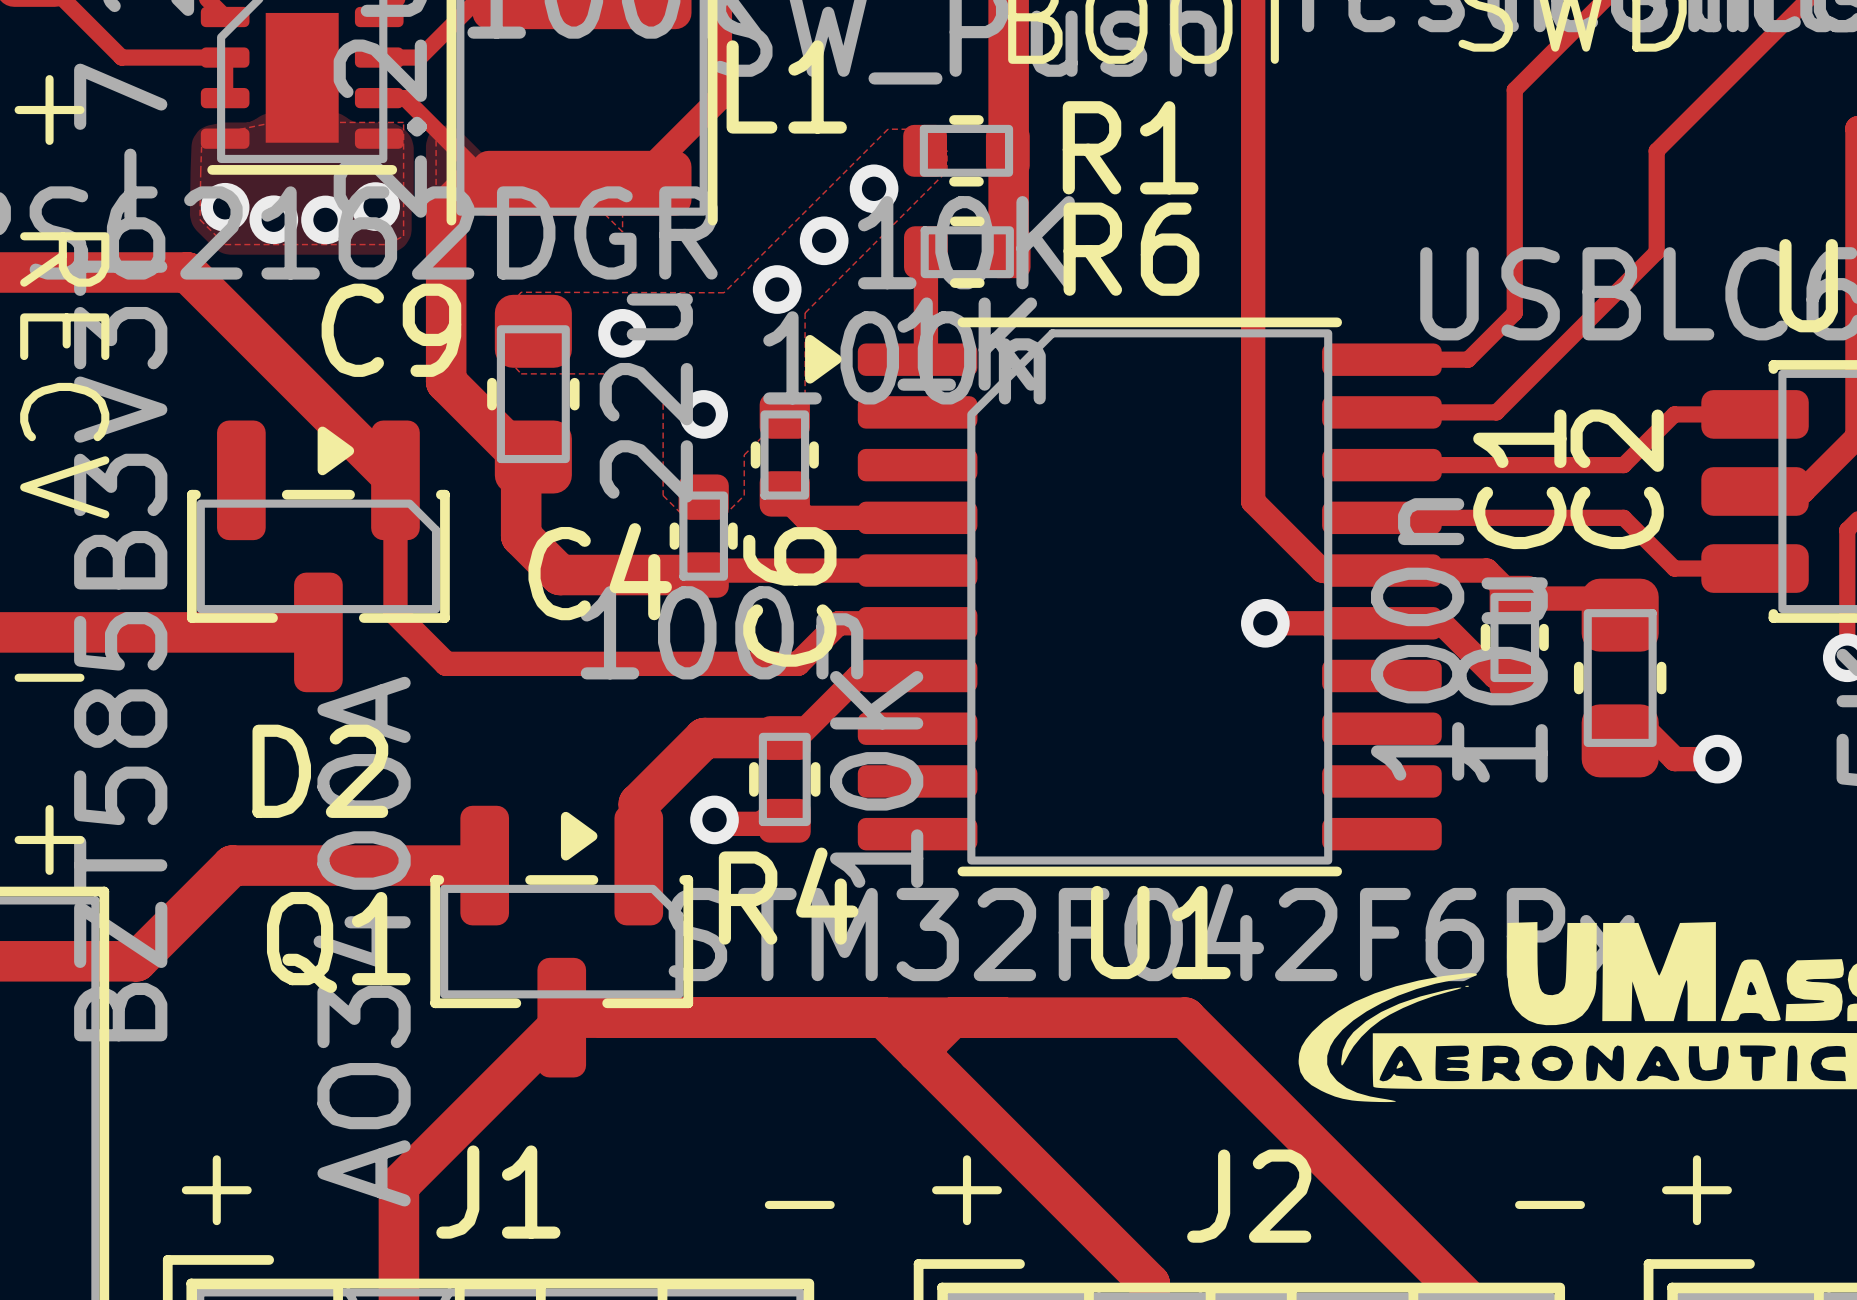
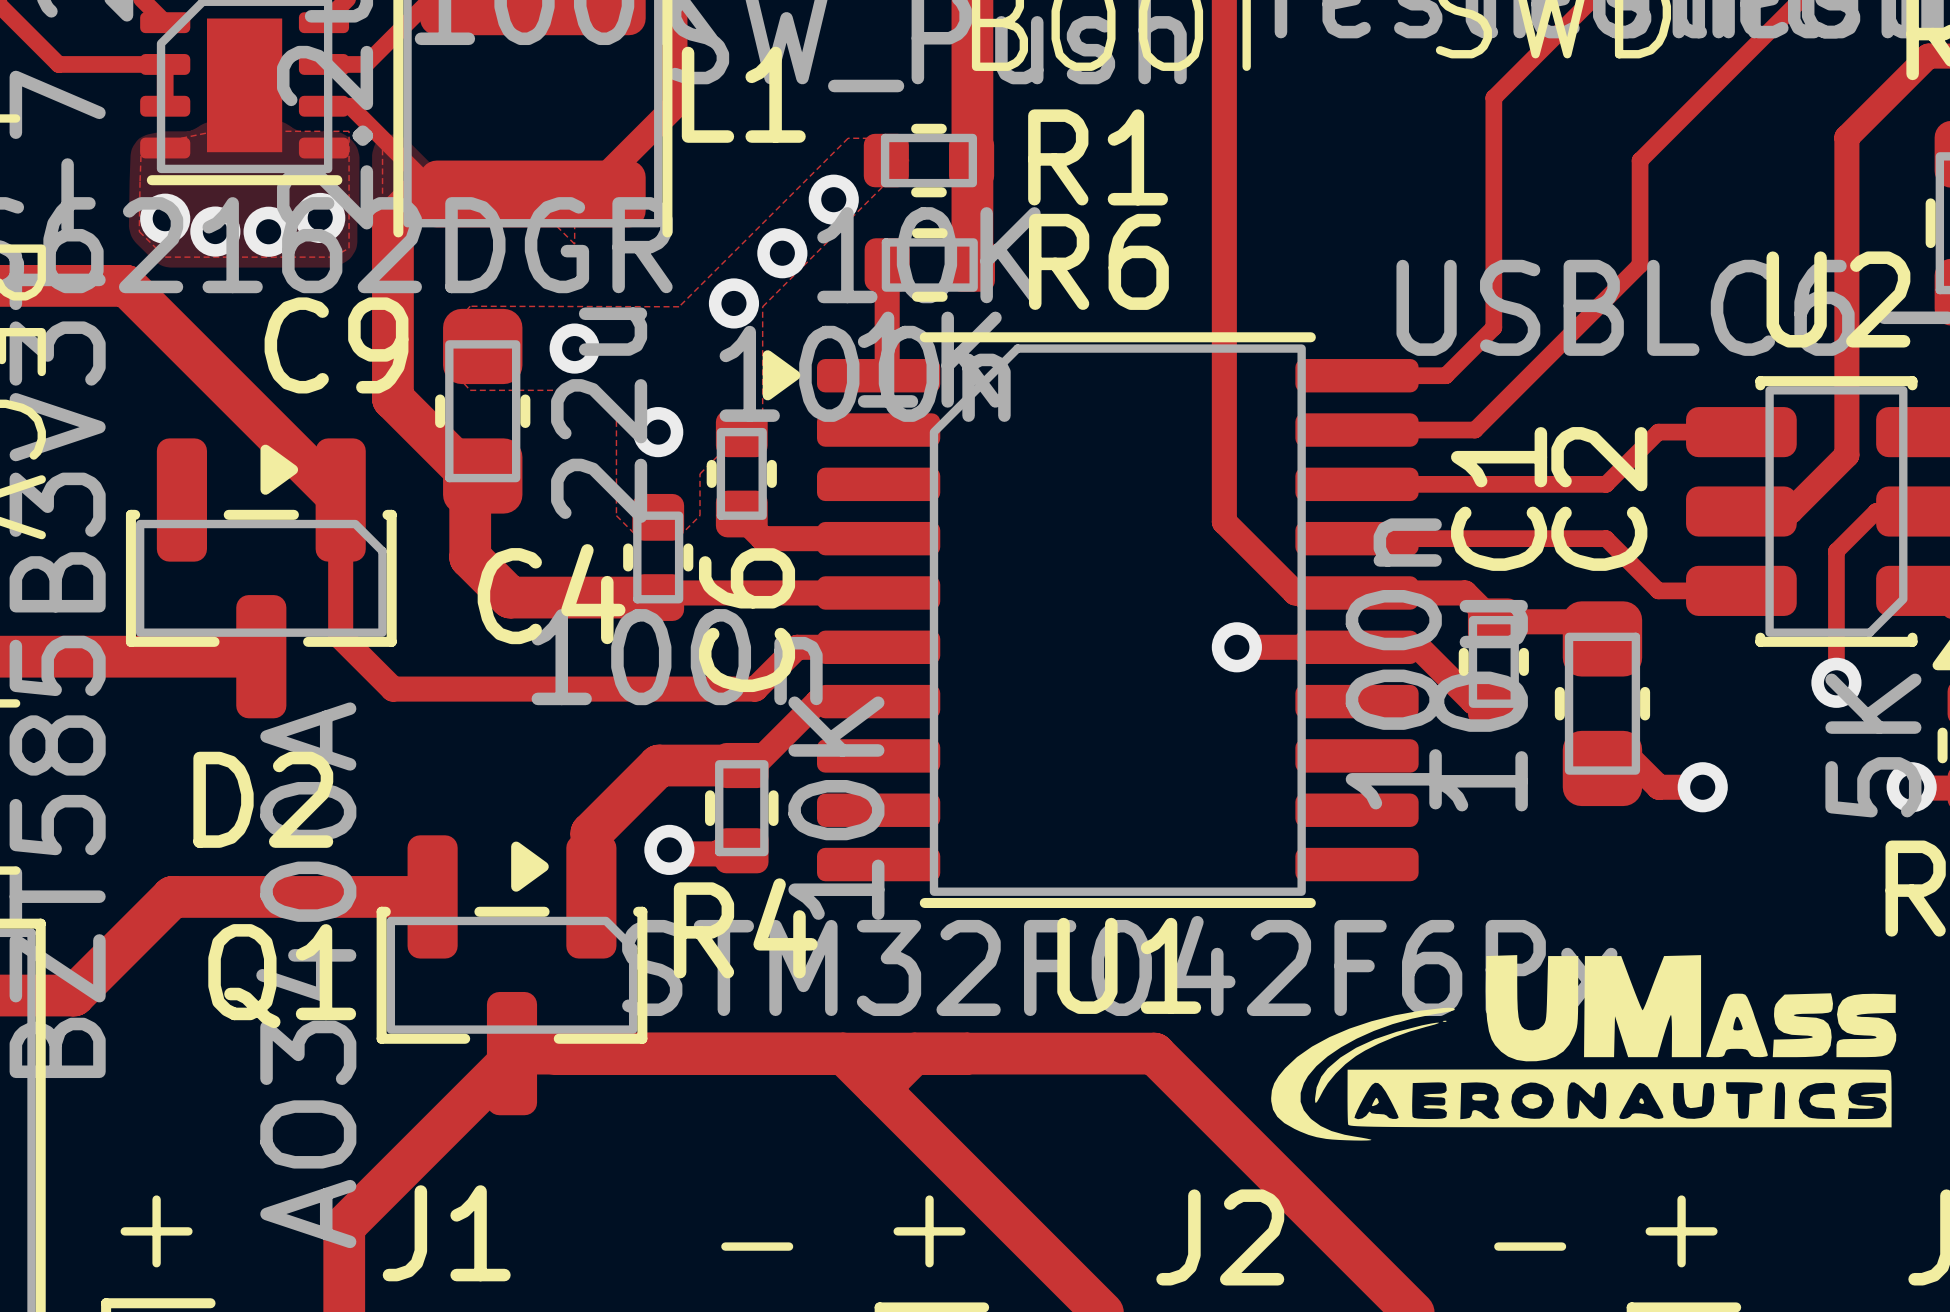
zone outline: (947, 150) (947, 171) (805, 313) -> (908, 160) (762, 306) (762, 327)

